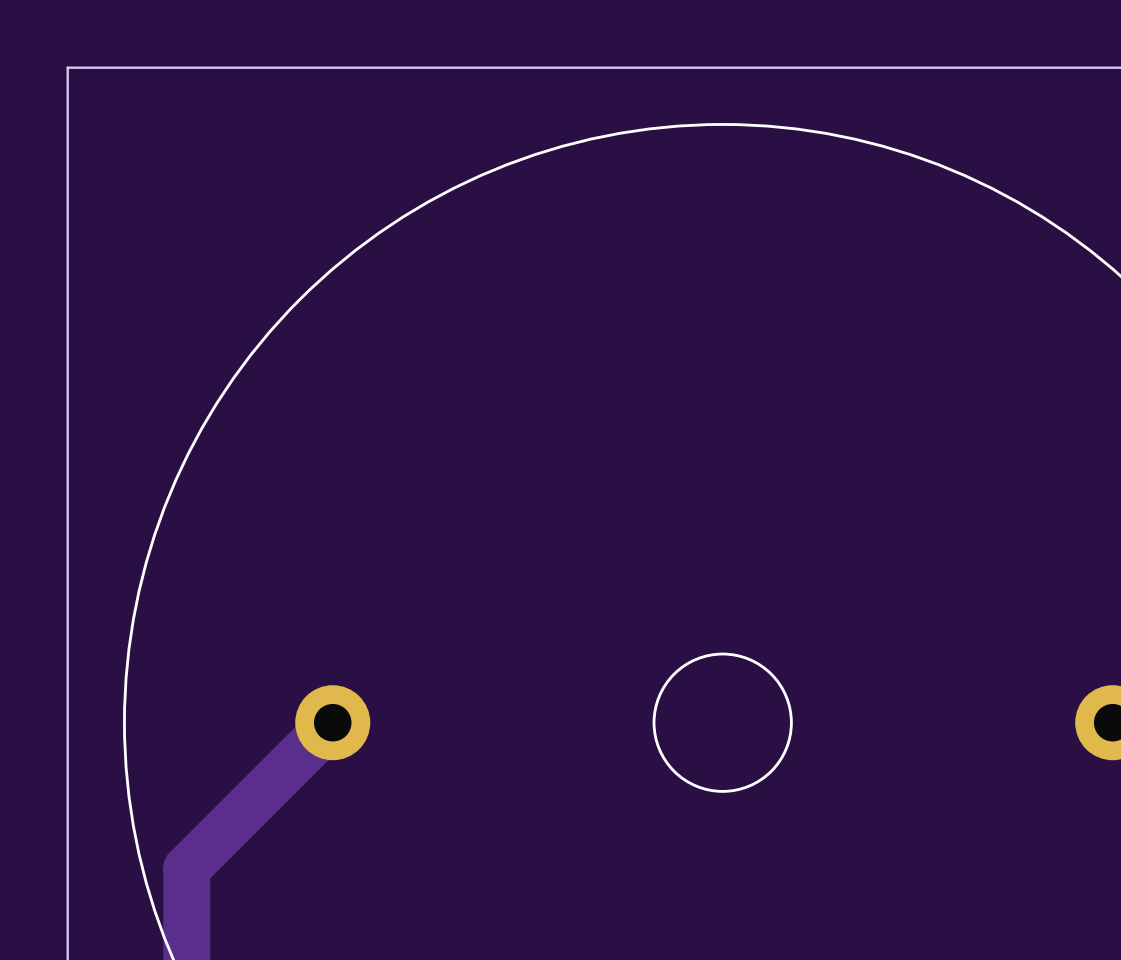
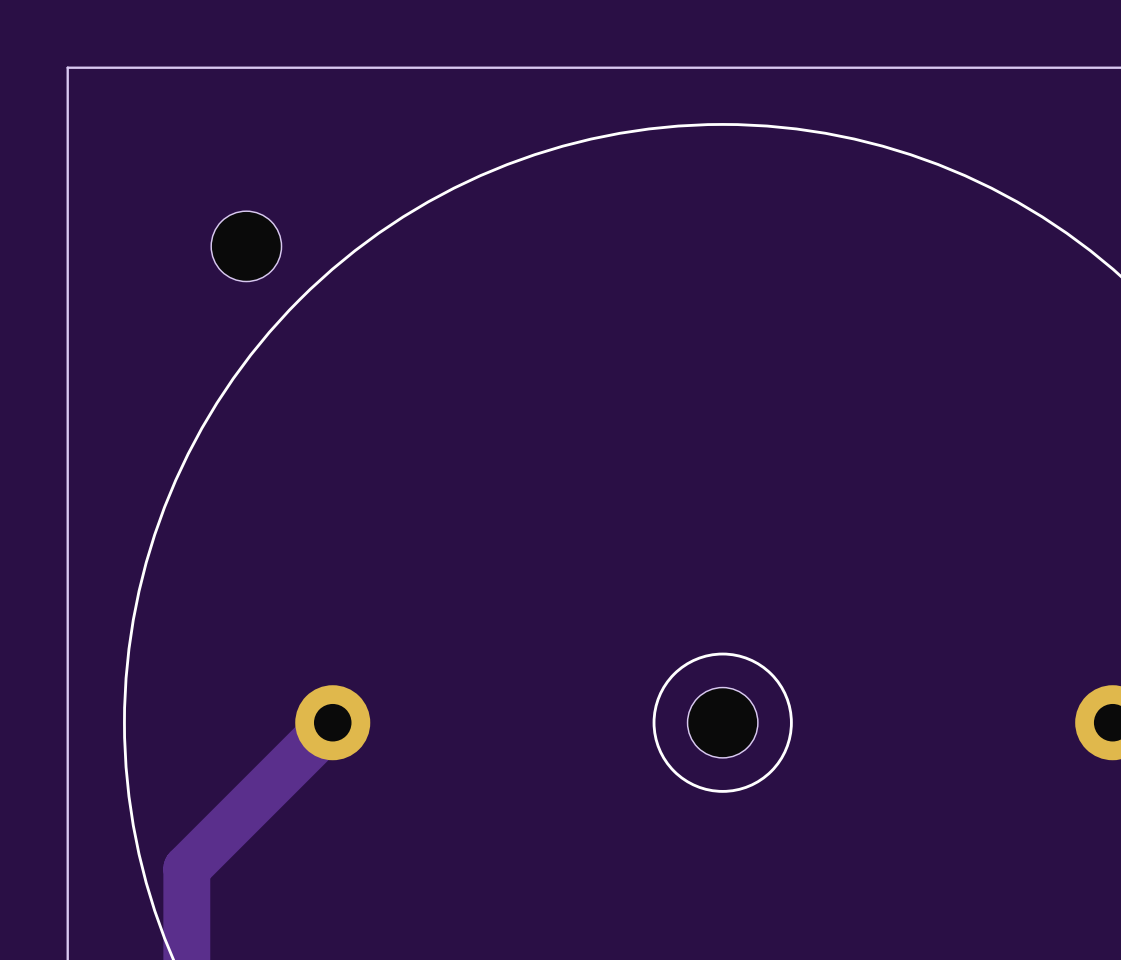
part: none -> (246, 246)
part: none -> (722, 722)

